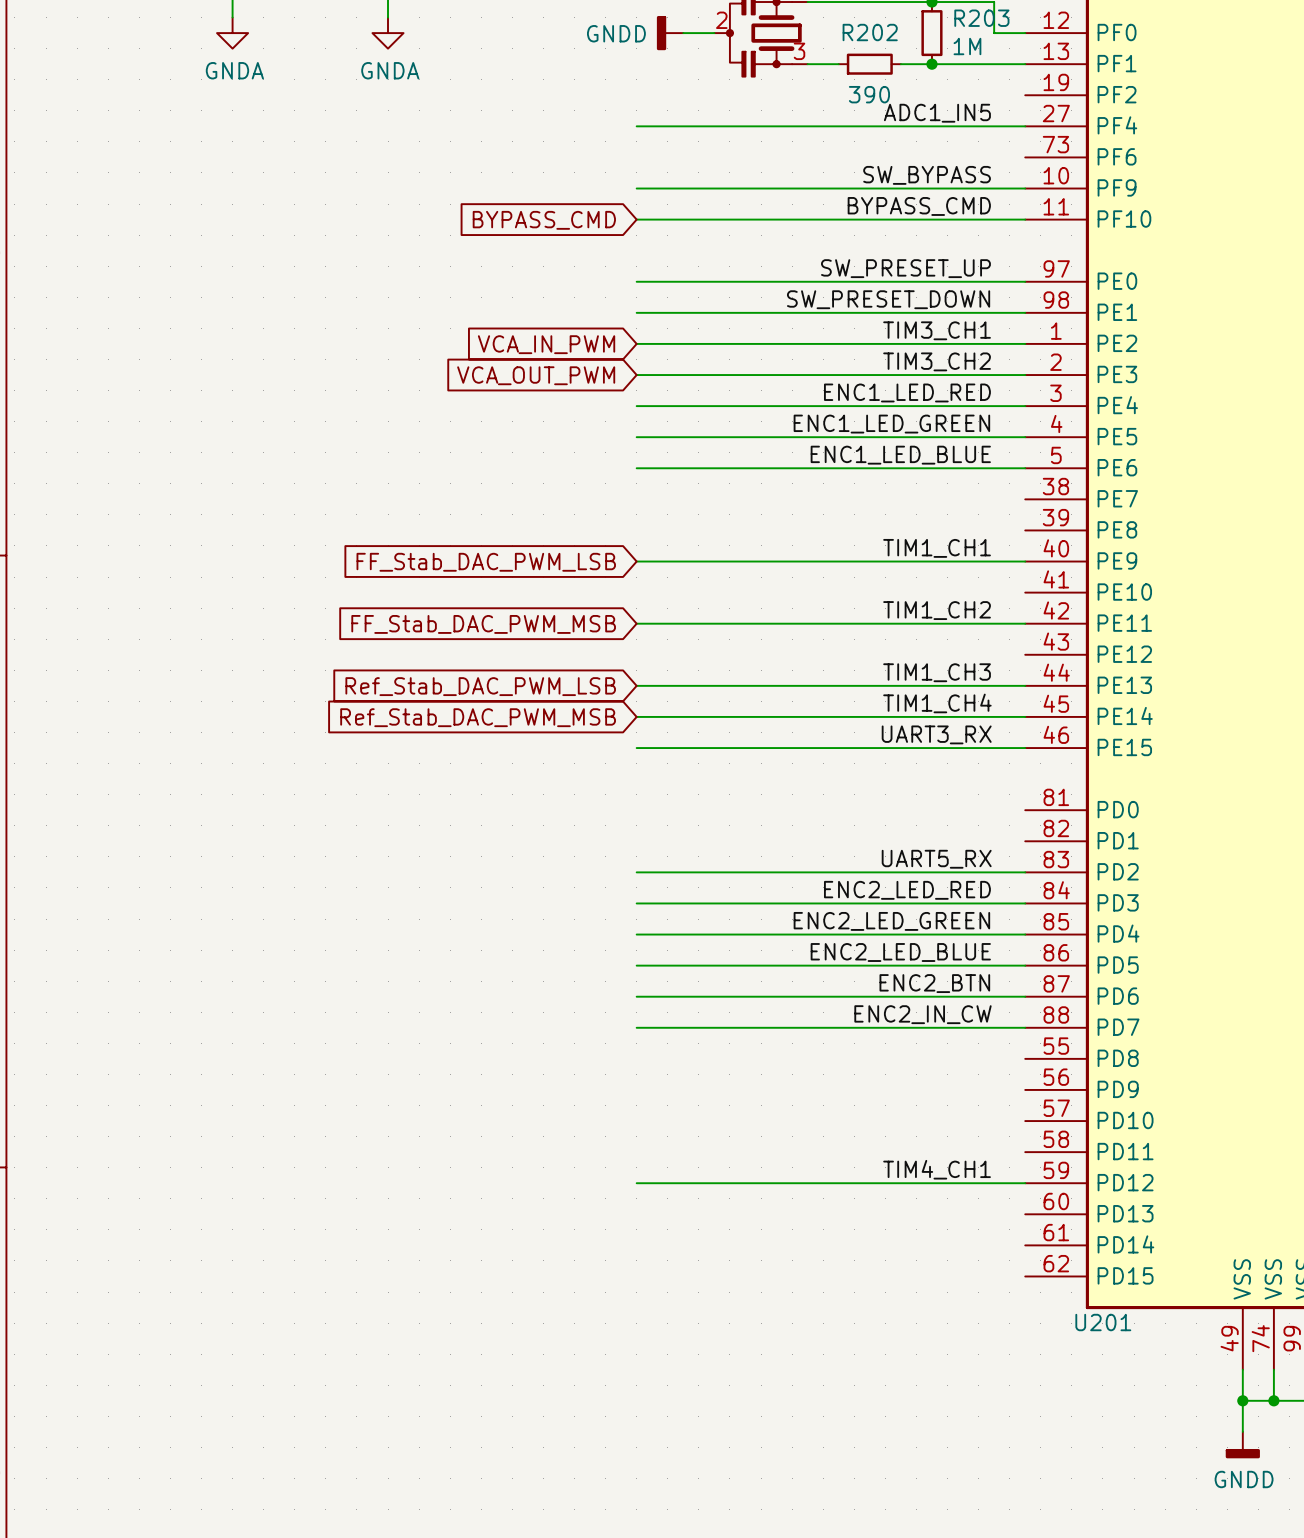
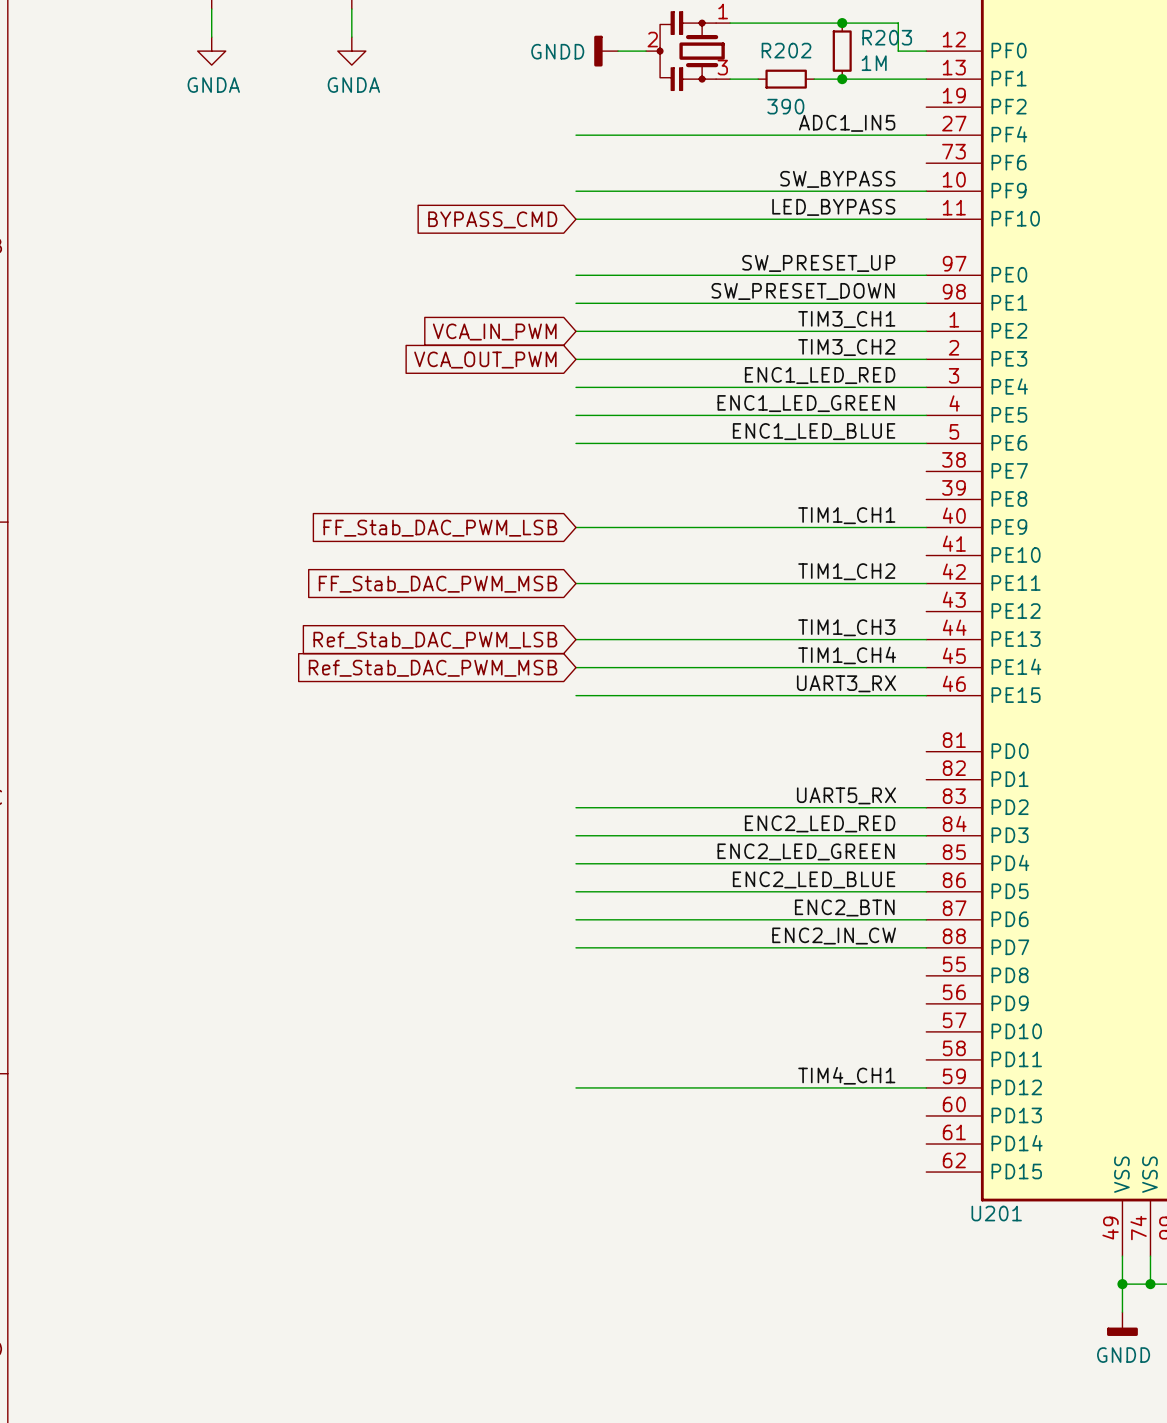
label: BYPASS_CMD (919, 206) -> LED_BYPASS (833, 207)

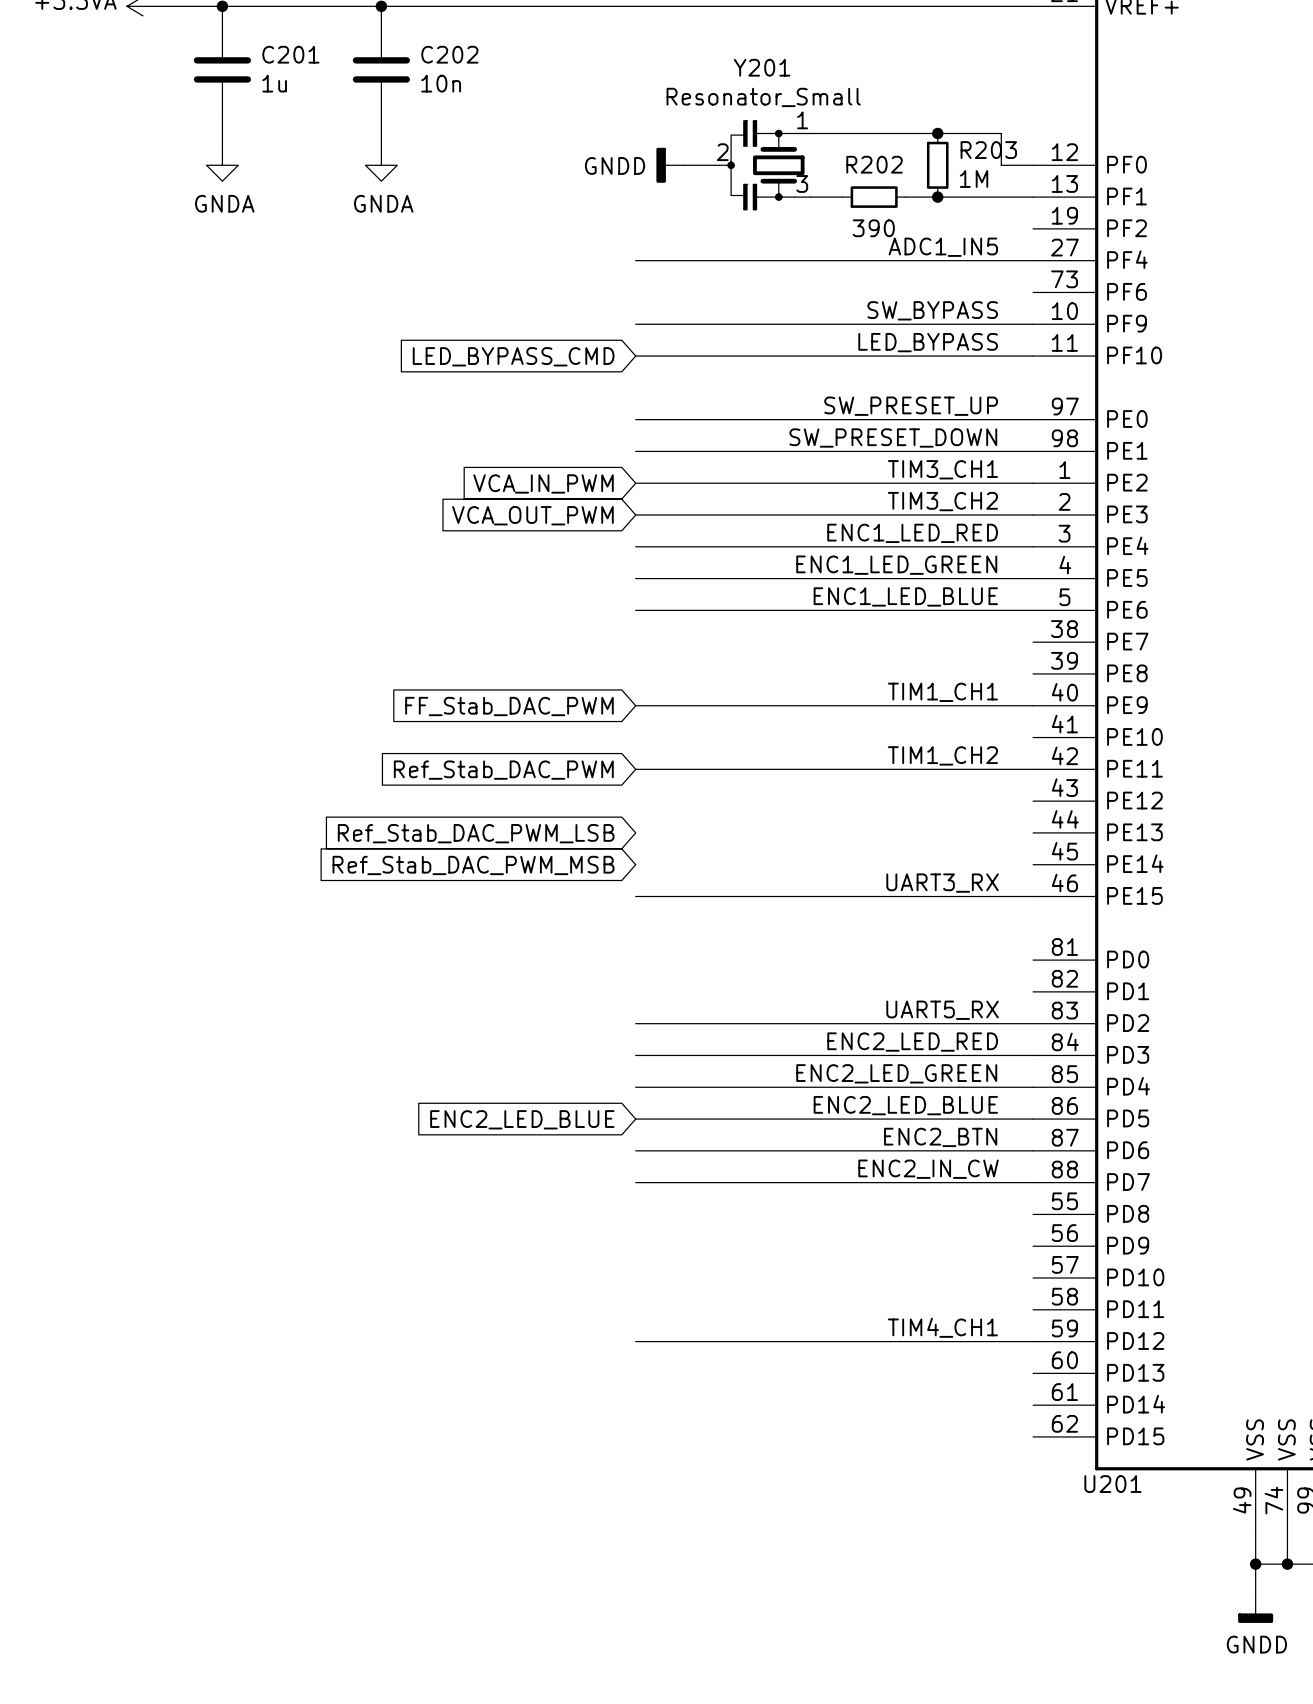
global label: BYPASS_CMD (492, 219) -> LED_BYPASS_CMD (513, 356)
global label: FF_Stab_DAC_PWM_LSB (440, 528) -> FF_Stab_DAC_PWM (509, 706)
global label: FF_Stab_DAC_PWM_MSB (438, 584) -> Ref_Stab_DAC_PWM (503, 770)
label: TIM1_CH3 (846, 627) -> none
wire: (576, 639) (926, 639) -> none
label: TIM1_CH4 (847, 655) -> none
wire: (576, 667) (926, 667) -> none
global label: none -> ENC2_LED_BLUE (522, 1119)

